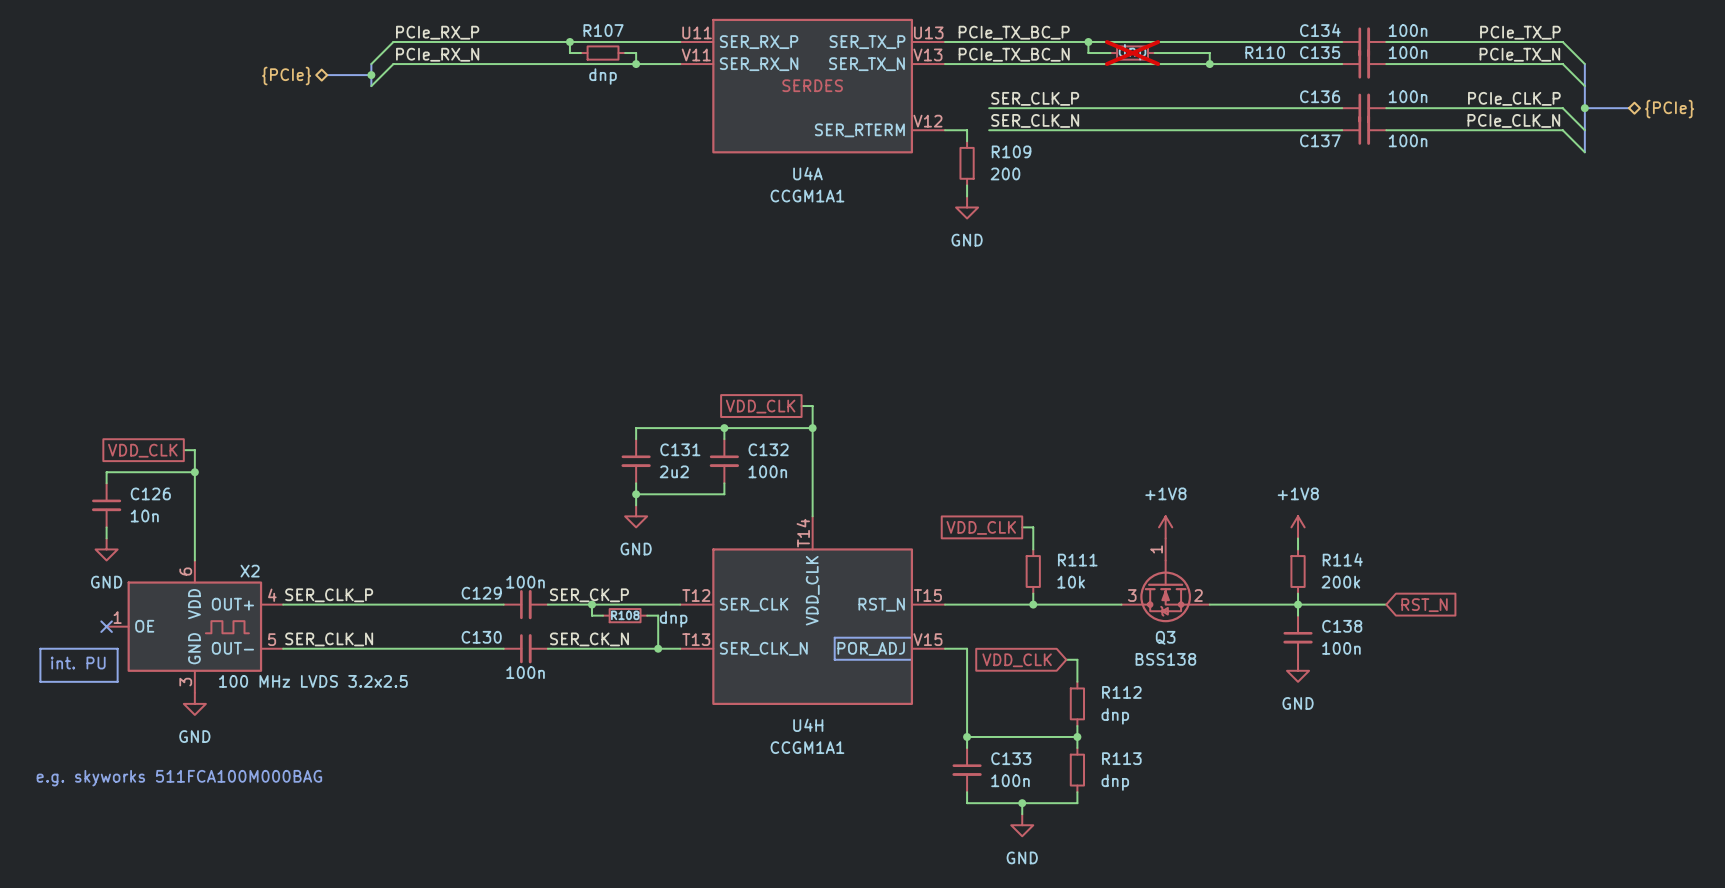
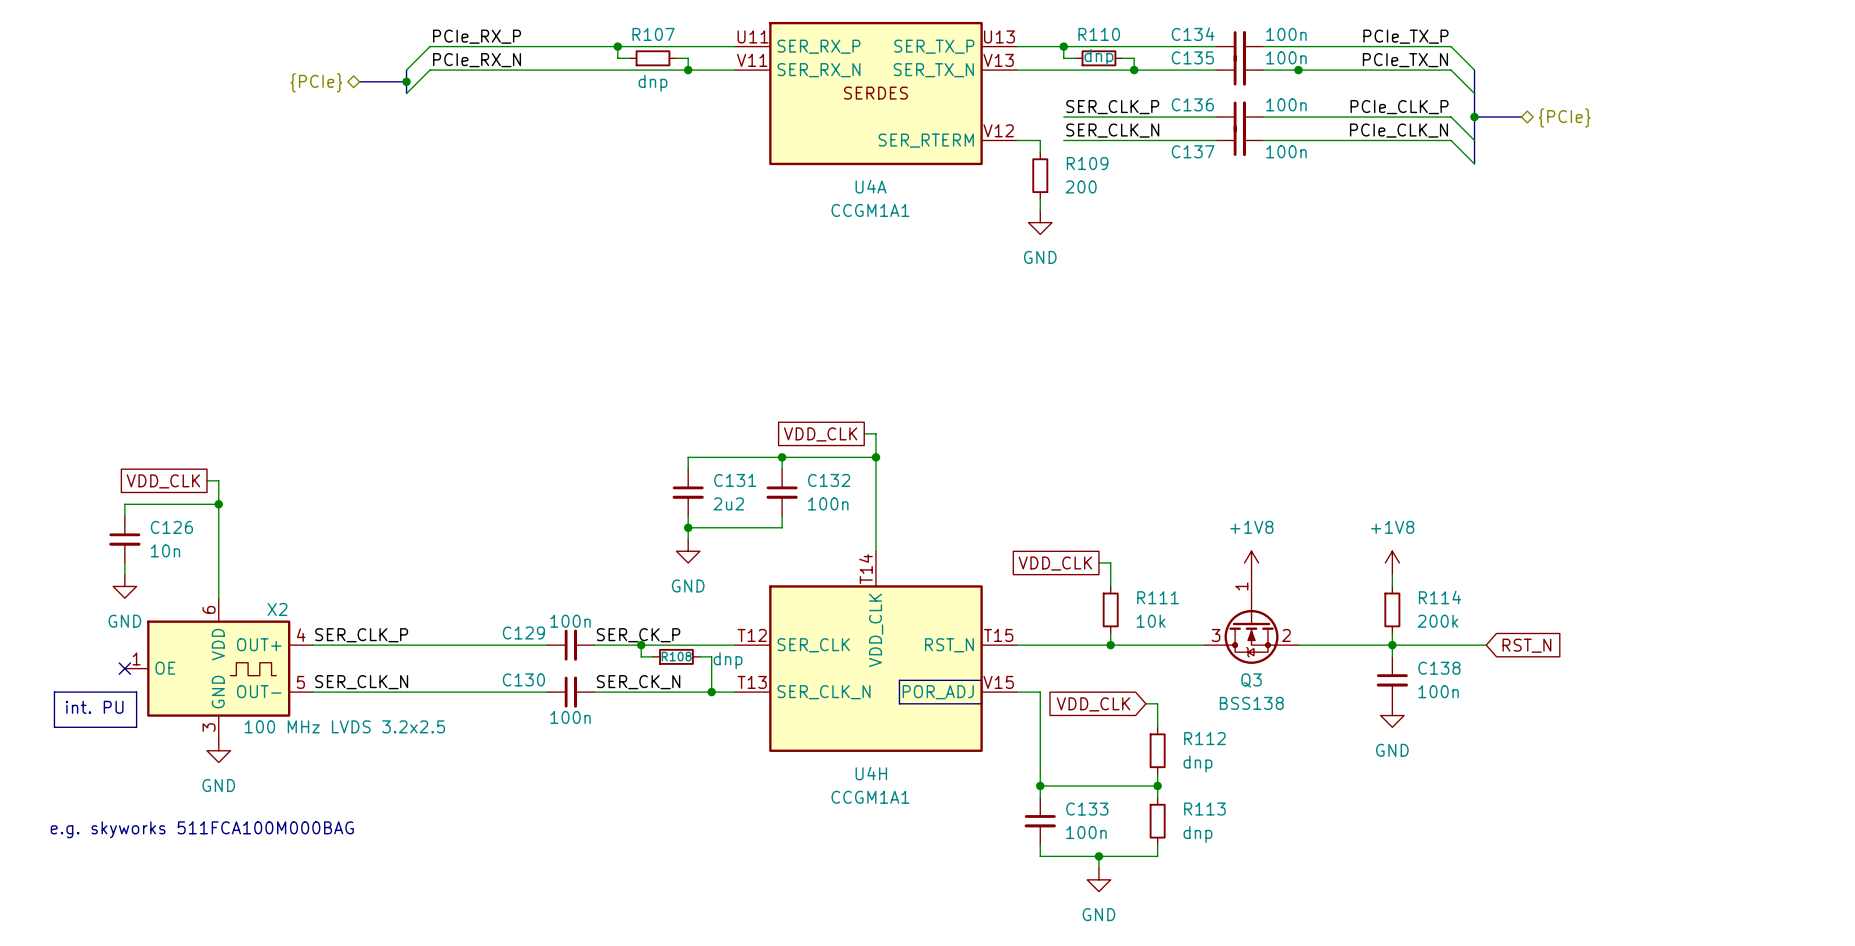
label: PCIe_TX_BC_P (1014, 32) -> none
label position: PCIe_TX_P (1520, 32) -> PCIe_TX_P (1405, 36)
wire: none -> (1063, 46) (1063, 58) (1075, 58)
junction: none -> (1063, 46)
wire: (1088, 41) (1088, 53) (1110, 53) -> none
junction position: (1088, 41) -> (1134, 70)
wire: none -> (1439, 46) (1451, 46) (1474, 70)
C134 position: (1364, 41) -> (1239, 46)
wire: (1386, 41) (1562, 41) (1584, 64) -> none
R110 name position: R110 (1265, 52) -> R110 (1099, 34)
wire: none -> (1122, 58) (1134, 58) (1134, 70)
R110 position: (1132, 53) -> (1098, 58)
R110 do-not-place cross: (1132, 53) -> none
wire: (1154, 53) (1209, 53) (1209, 64) -> none
label: PCIe_TX_BC_N (1014, 54) -> none
label position: PCIe_TX_N (1519, 54) -> PCIe_TX_N (1405, 60)
wire: none -> (1439, 70) (1451, 70) (1474, 93)
C135 position: (1364, 64) -> (1239, 70)
wire: (1386, 64) (1562, 64) (1584, 86) -> none
bus: (1584, 64) (1584, 152) -> (1474, 70) (1474, 163)
label position: PCIe_CLK_P (1514, 98) -> PCIe_CLK_P (1399, 107)
wire: none -> (1439, 117) (1451, 117) (1474, 140)
C136 position: (1364, 108) -> (1239, 117)
junction: none -> (1474, 117)
wire: (1386, 108) (1562, 108) (1584, 130) -> none
bus: (1584, 108) (1628, 108) -> (1474, 117) (1521, 117)
junction: (1584, 108) -> none
hierarchical label position: {PCIe} (1669, 109) -> {PCIe} (1564, 117)
label position: PCIe_CLK_N (1513, 120) -> PCIe_CLK_N (1398, 130)
wire: none -> (1439, 140) (1451, 140) (1474, 163)
C137 position: (1364, 130) -> (1239, 140)
wire: (1386, 130) (1562, 130) (1584, 152) -> none

